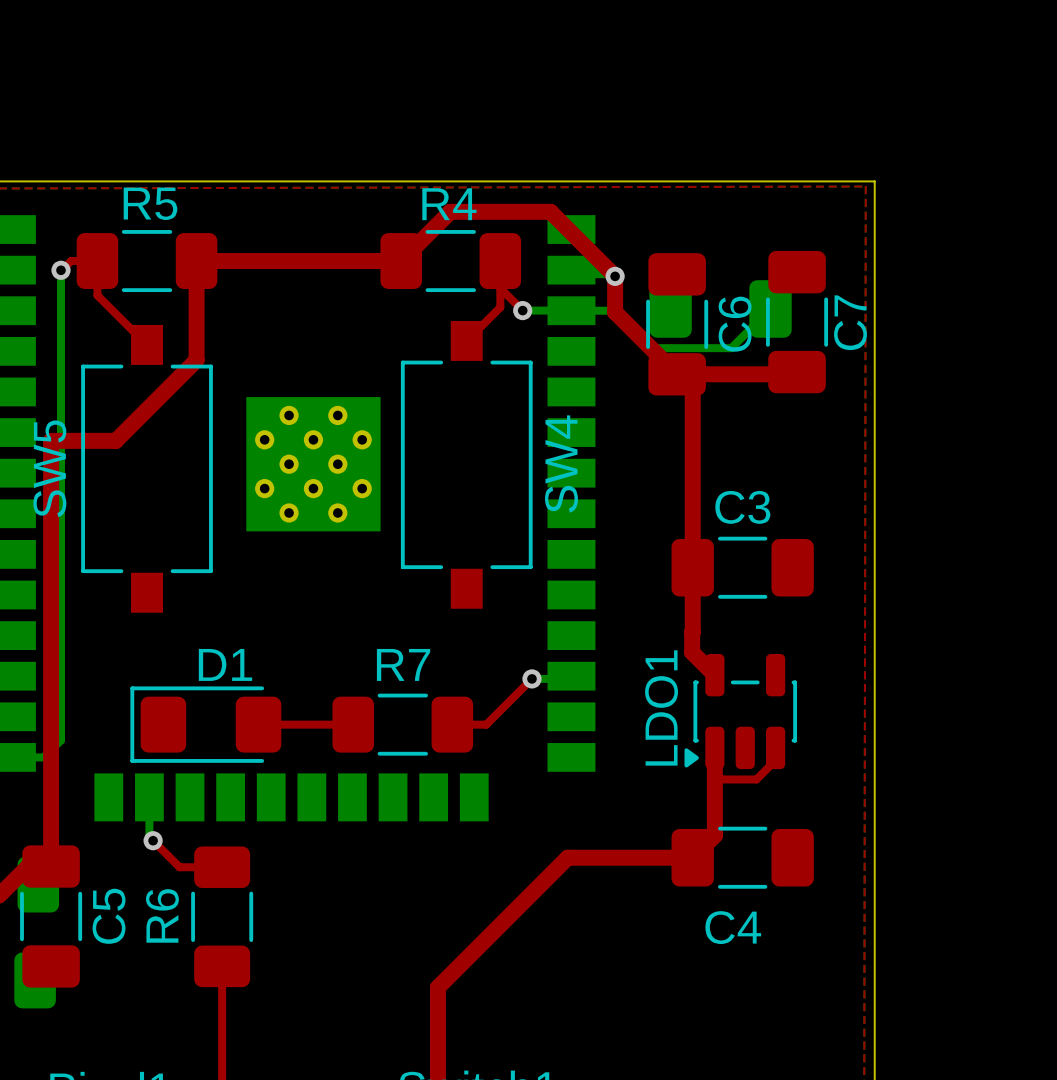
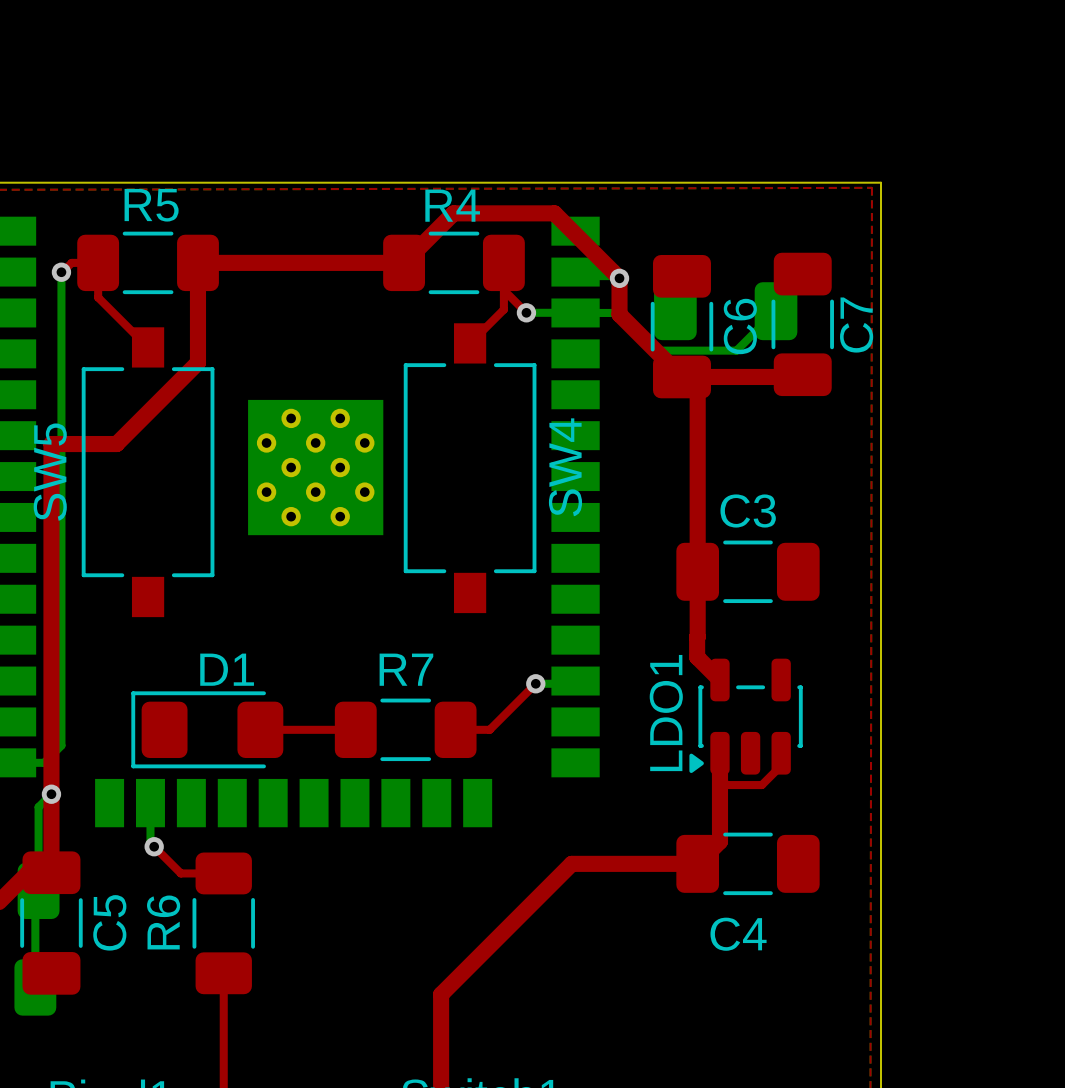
bottom track: none -> (51, 794) (38, 807) (38, 890) (35, 894) (35, 987)
via: none -> (51, 794)

